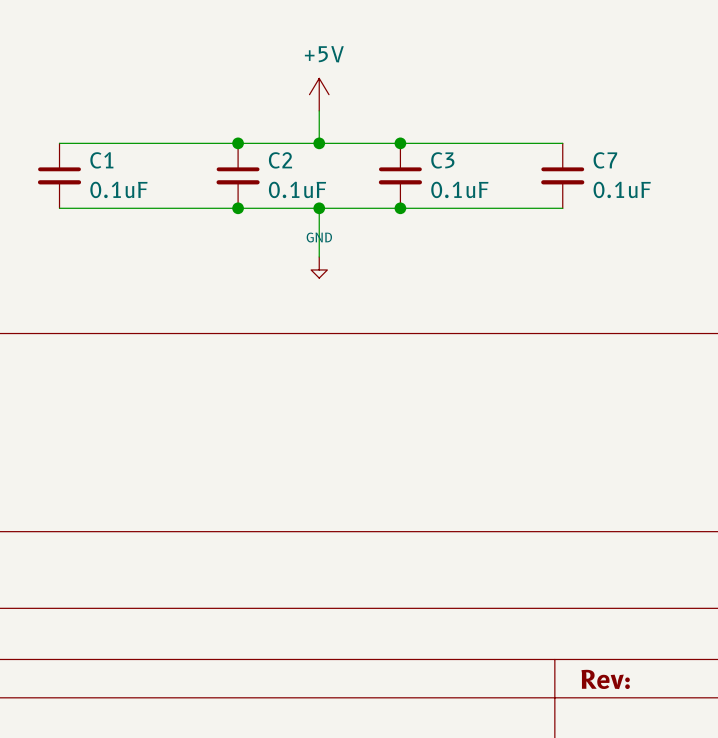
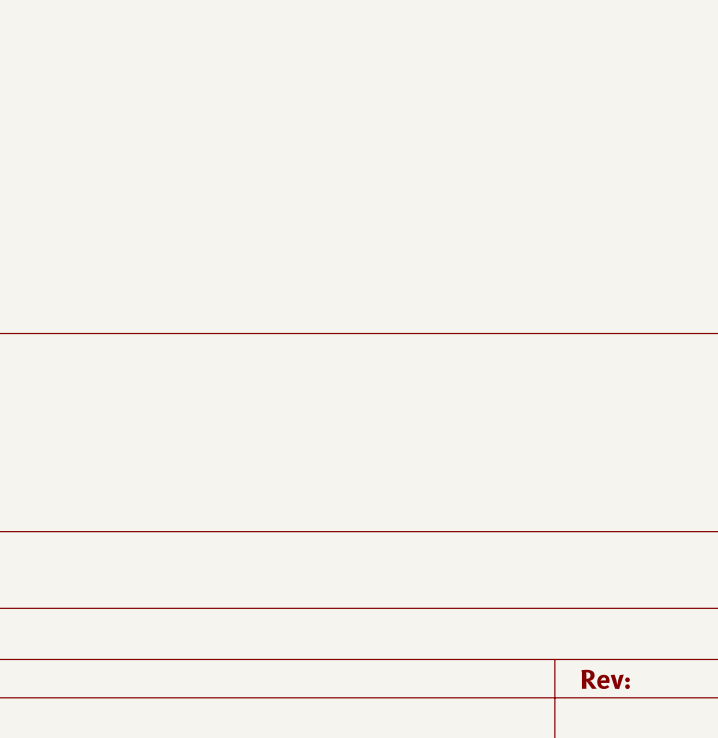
power symbol: +5V (319, 94) -> none
wire: (319, 110) (319, 143) -> none
wire: (59, 143) (562, 143) -> none
junction: (238, 143) -> none
junction: (319, 143) -> none
junction: (400, 143) -> none
C1: 0.1uF (59, 175) -> none
C2: 0.1uF (238, 175) -> none
C3: 0.1uF (400, 175) -> none
C7: 0.1uF (562, 175) -> none
wire: (59, 208) (562, 208) -> none
junction: (238, 208) -> none
wire: (319, 208) (319, 256) -> none
junction: (319, 208) -> none
junction: (400, 208) -> none
power symbol: GND (319, 267) -> none

